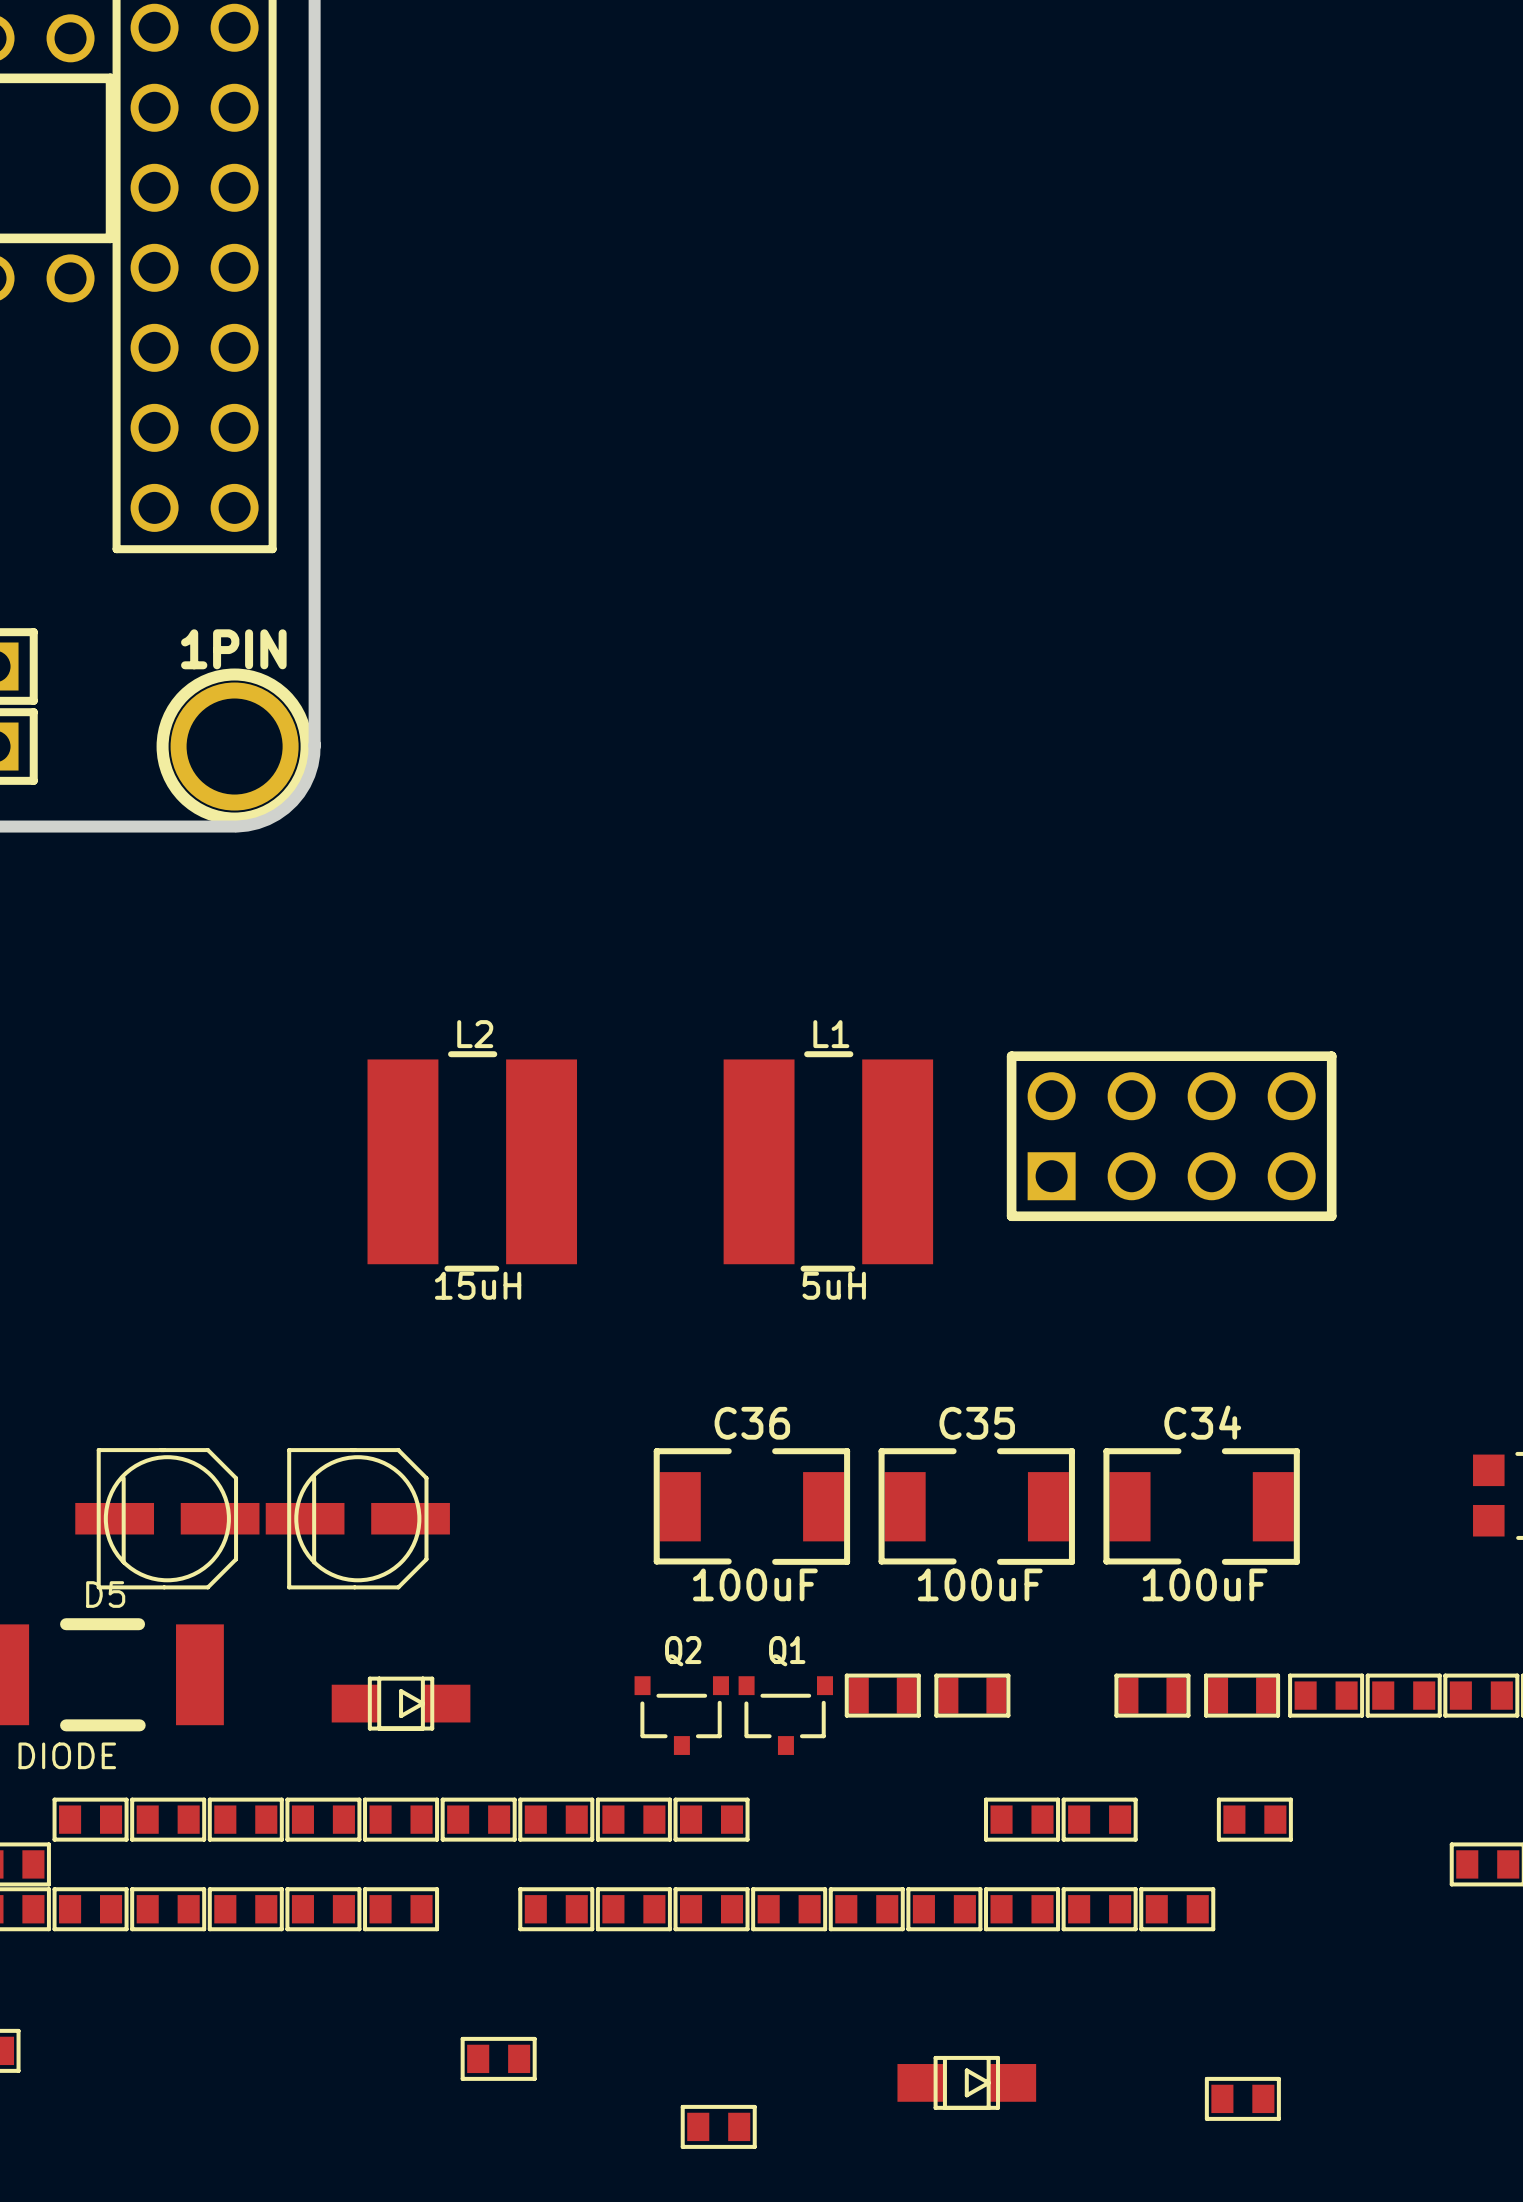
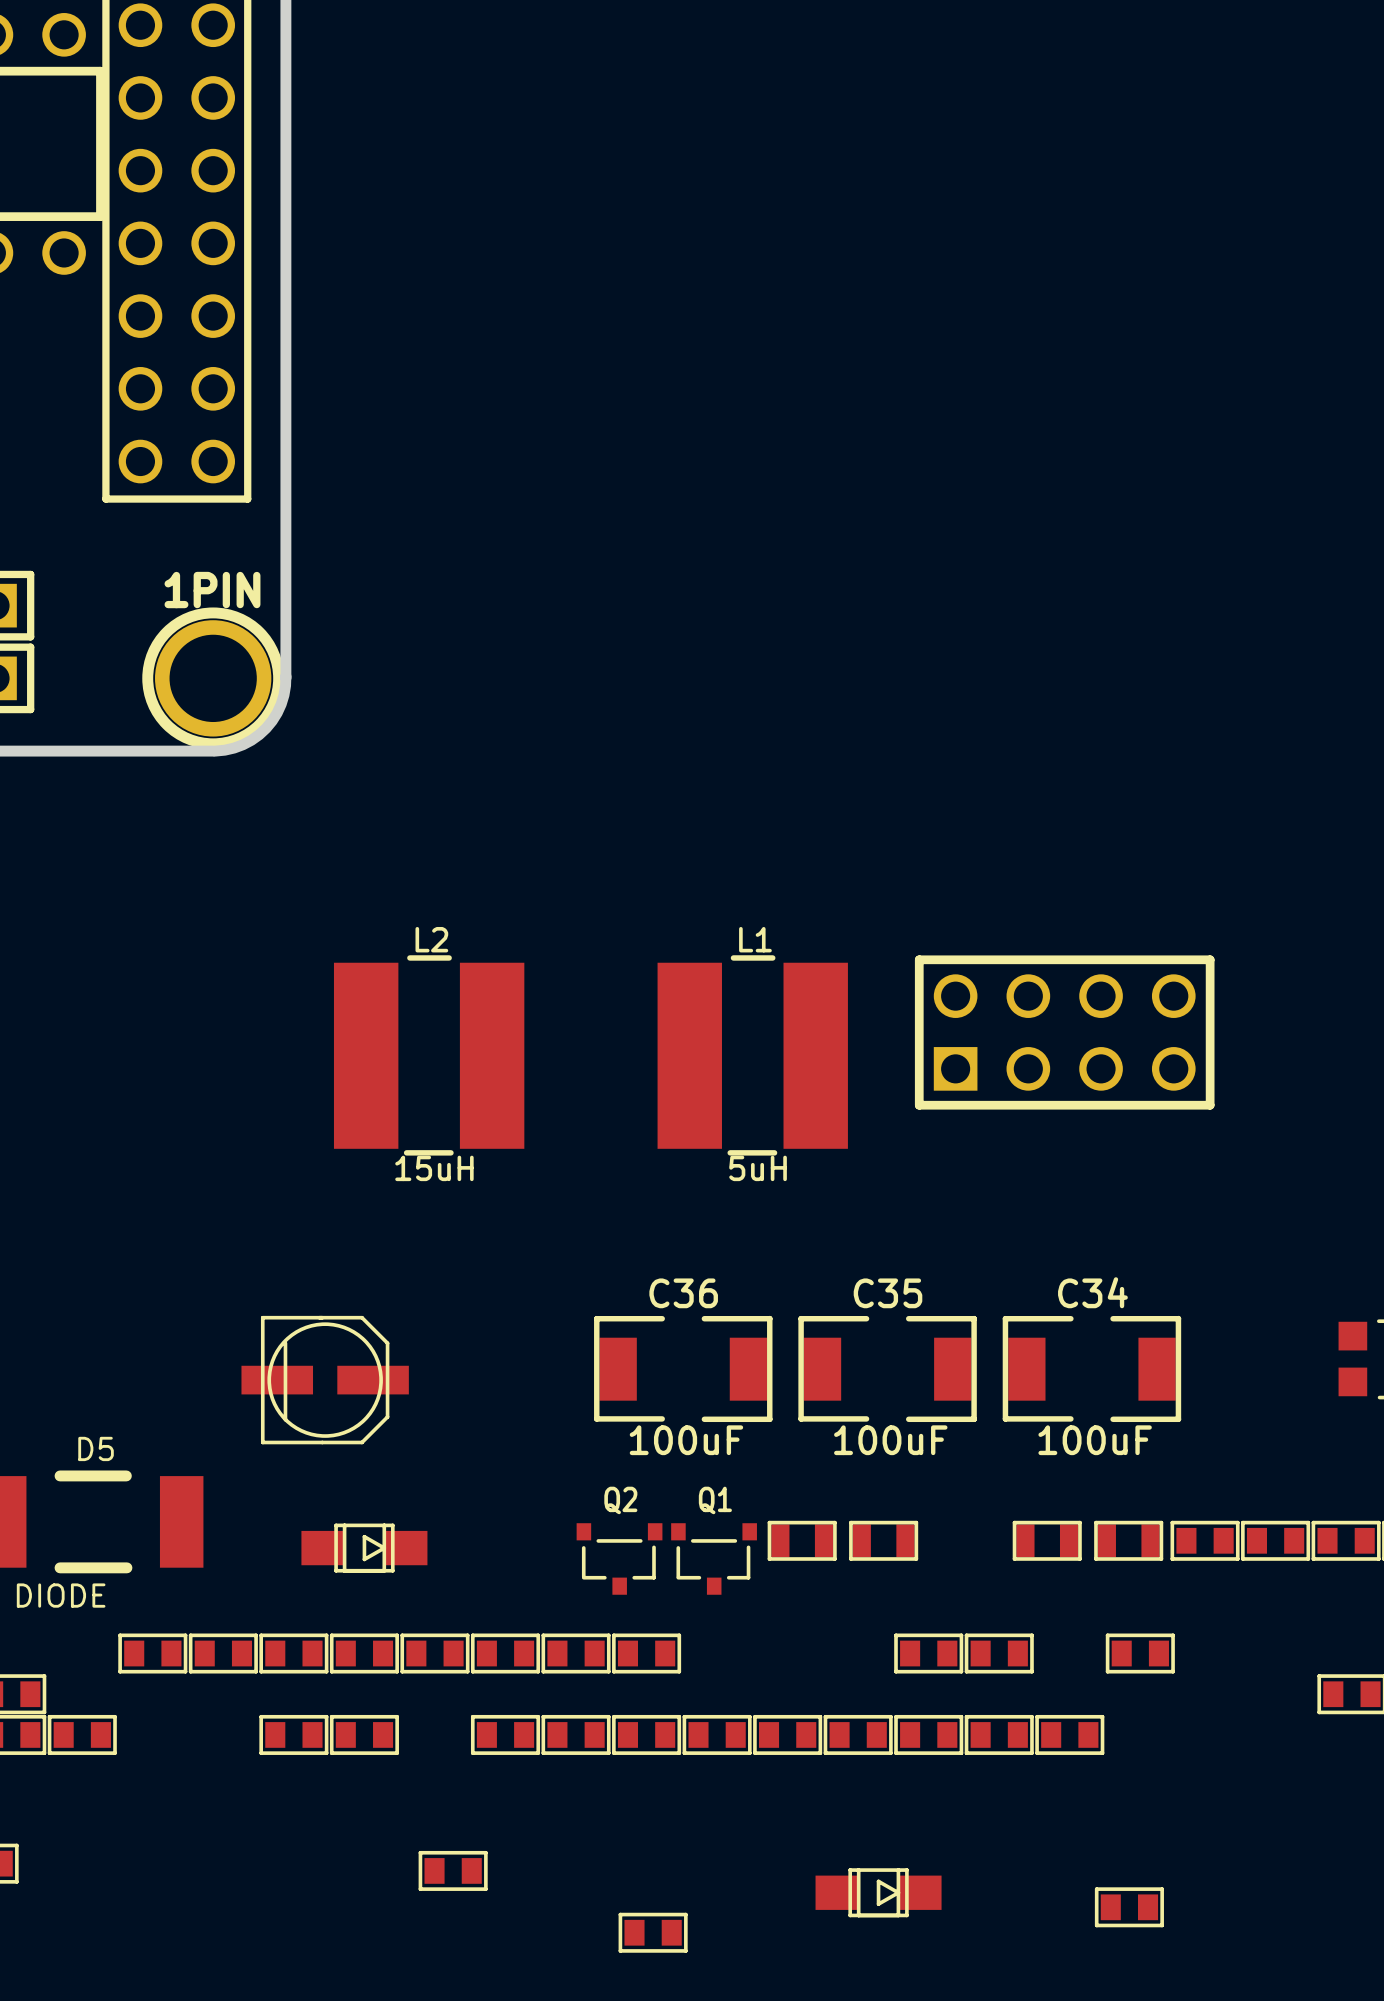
part: (167, 1518) -> none
part: (90, 1819) -> none
part: (168, 1909) -> none
part: (245, 1909) -> none

